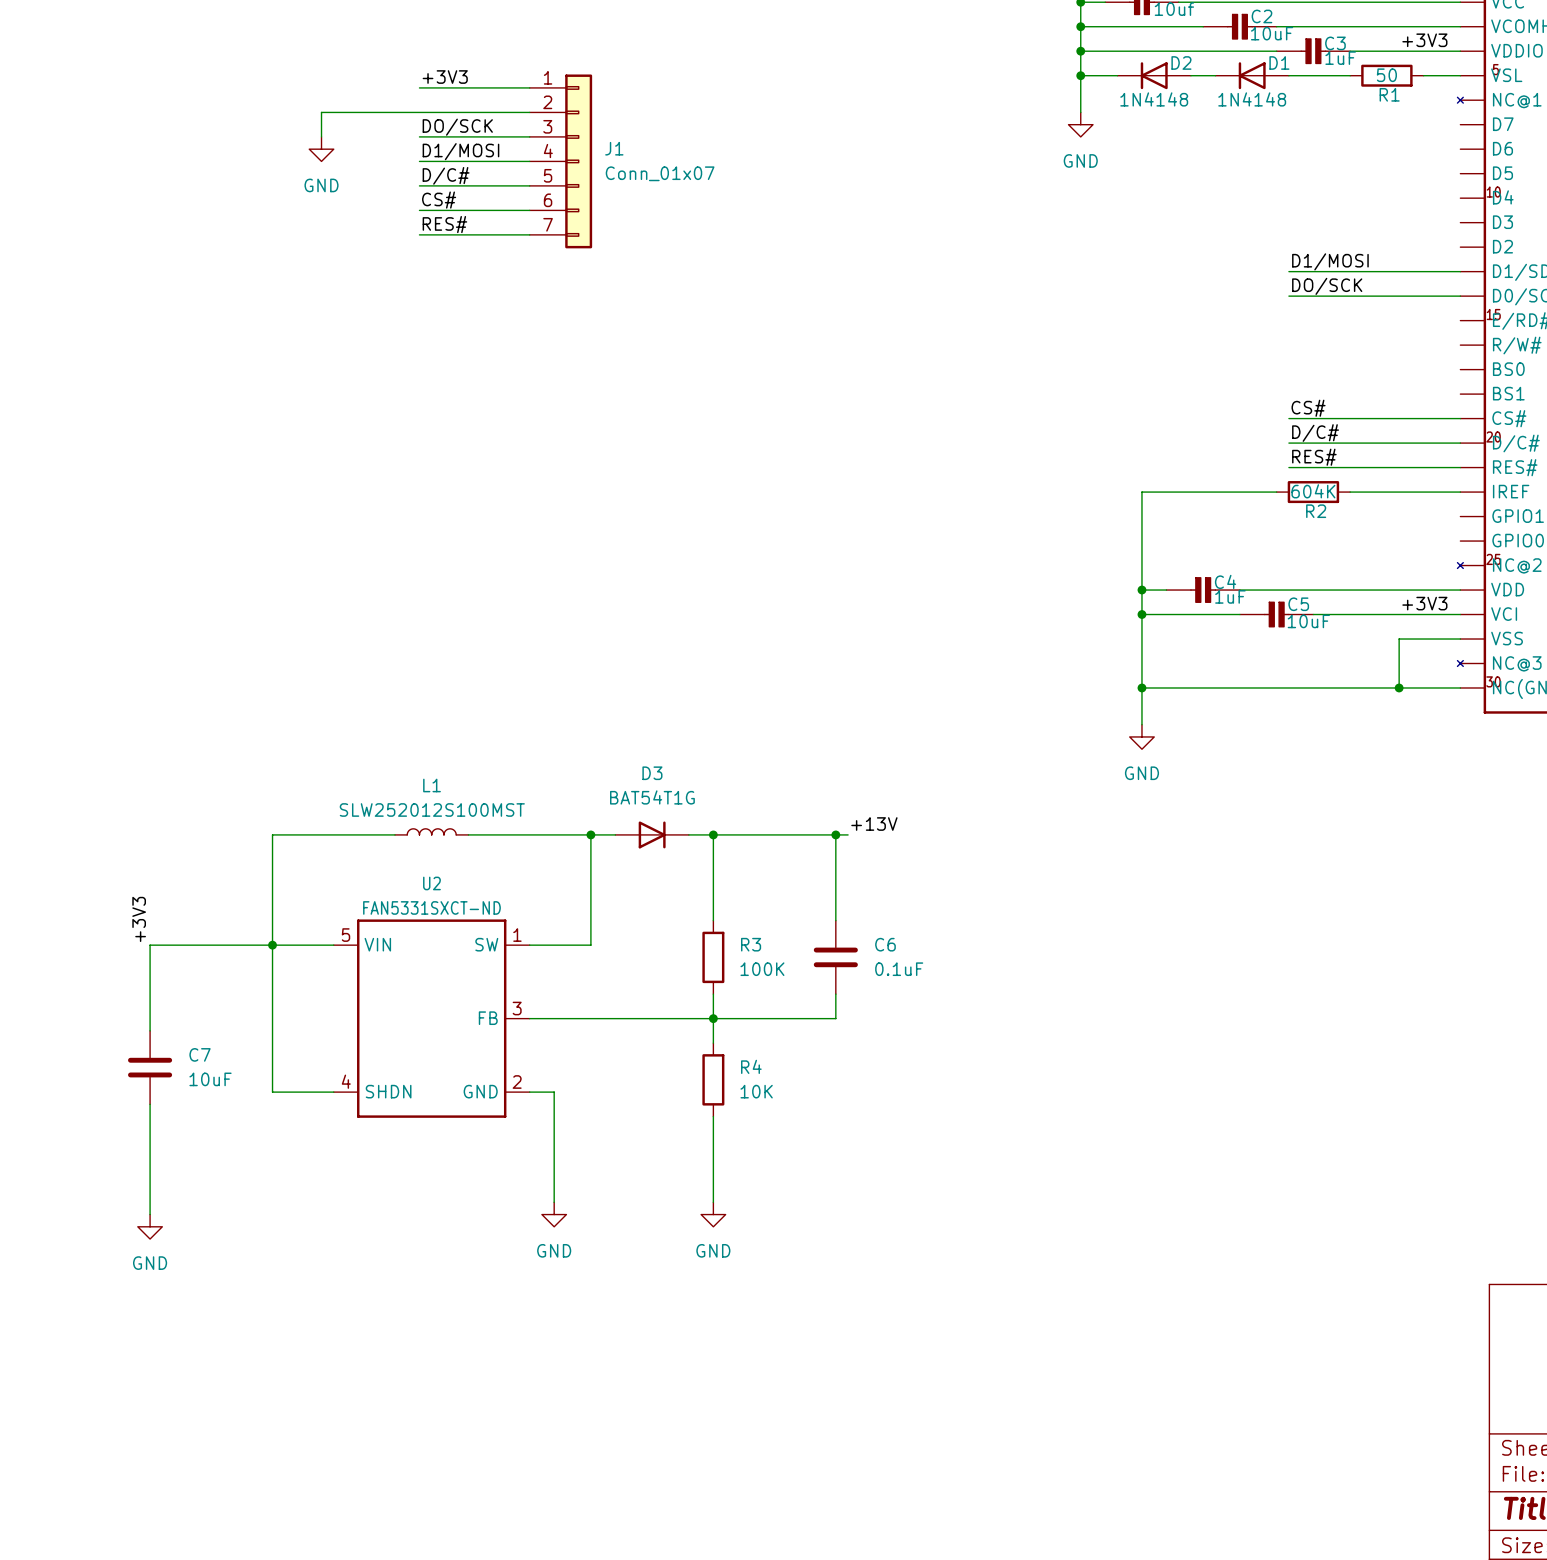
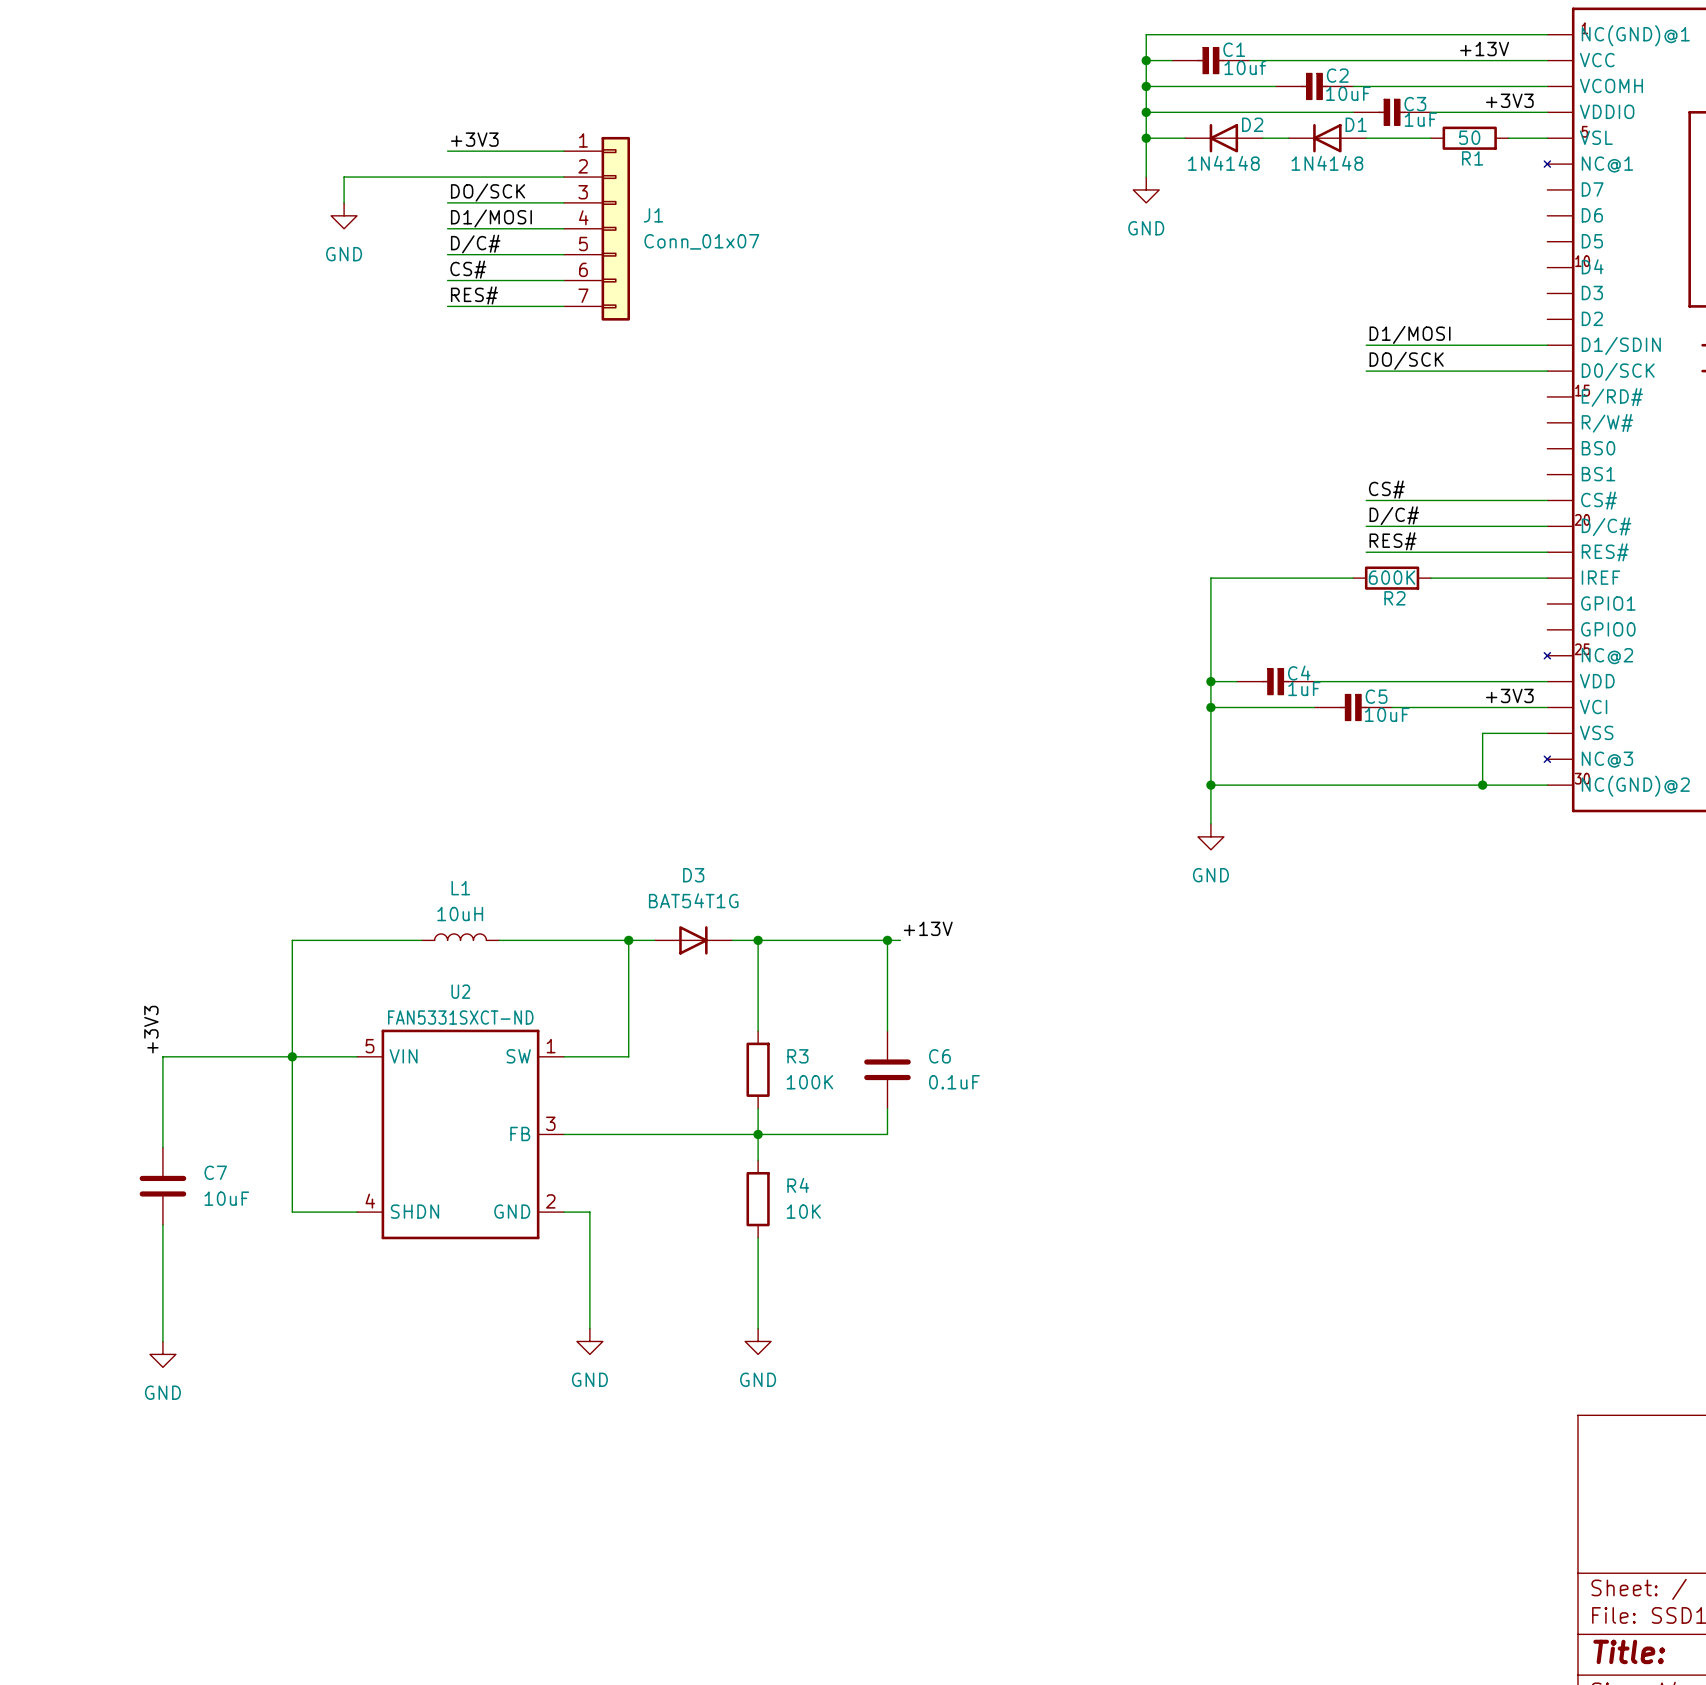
R2 value: 604K (1313, 491) -> 600K (1392, 577)
L1 value: SLW252012S100MST (432, 809) -> 10uH (460, 914)

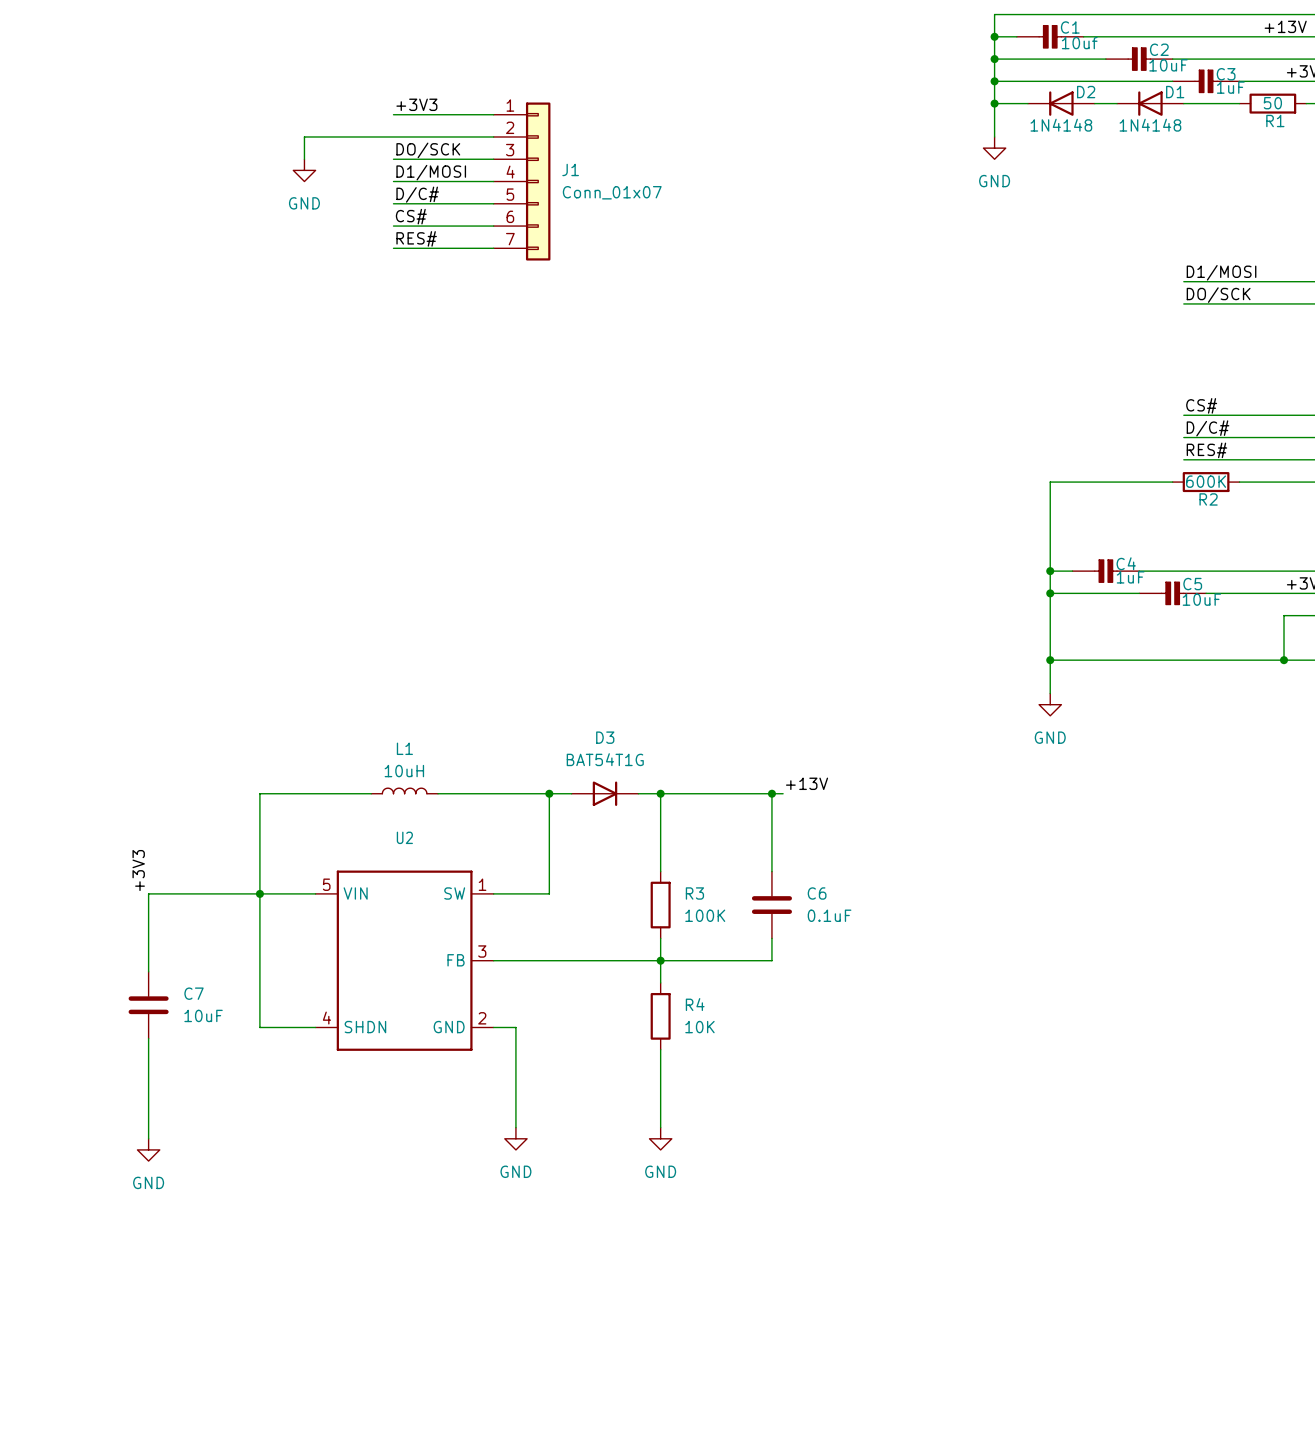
U2 value: FAN5331SXCT-ND (460, 1017) -> none

